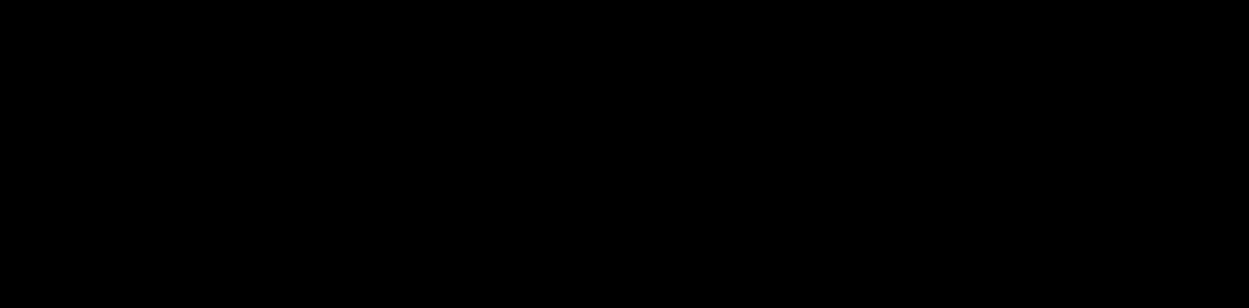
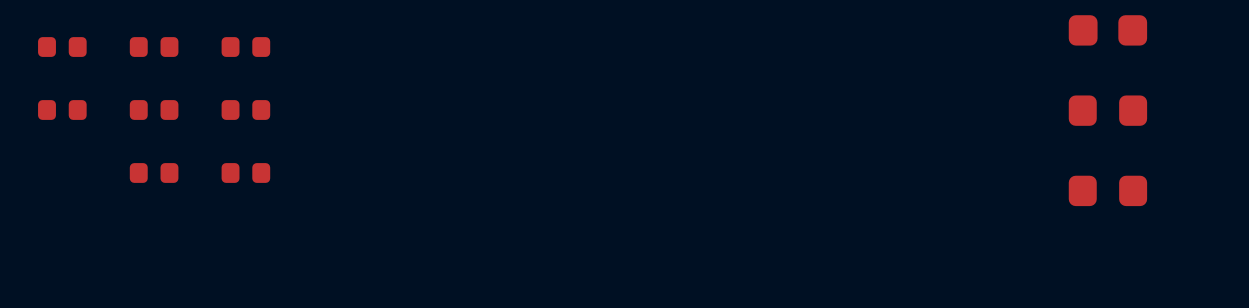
part: none -> (1107, 30)
part: none -> (62, 47)
part: none -> (154, 47)
part: none -> (245, 47)
part: none -> (62, 110)
part: none -> (154, 110)
part: none -> (245, 110)
part: none -> (1107, 110)
part: none -> (154, 173)
part: none -> (245, 173)
part: none -> (1107, 190)

